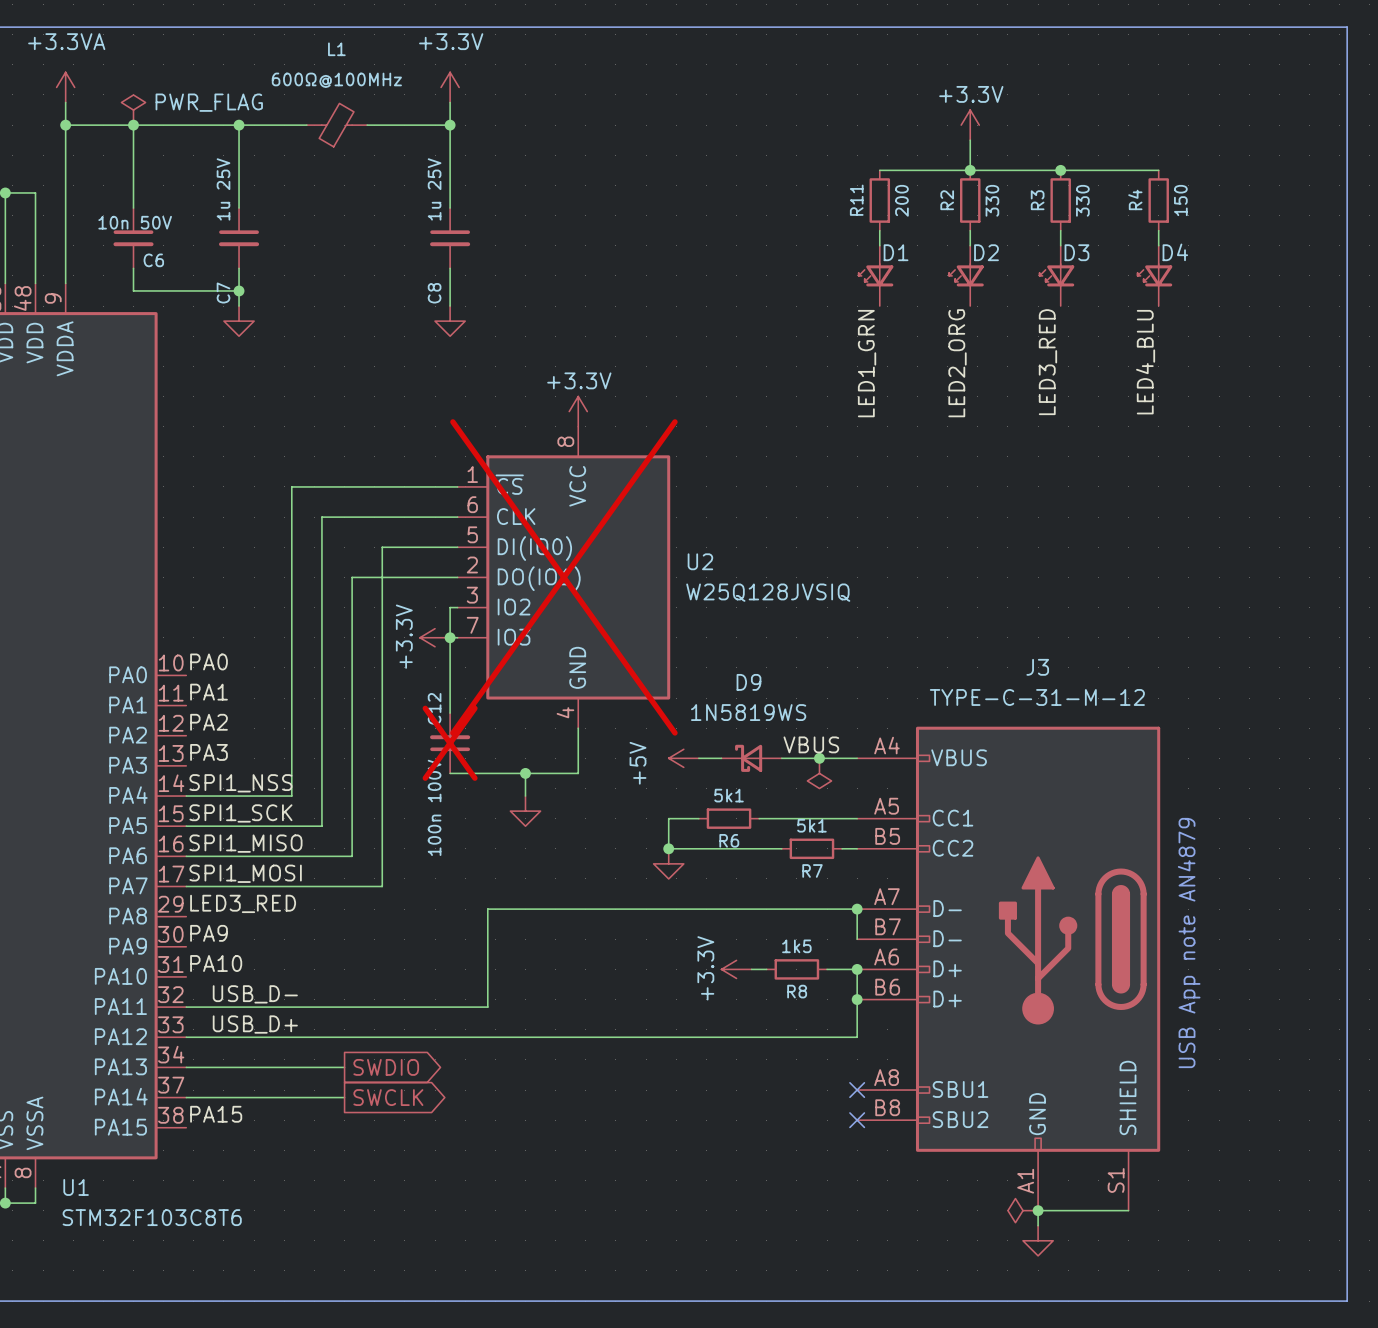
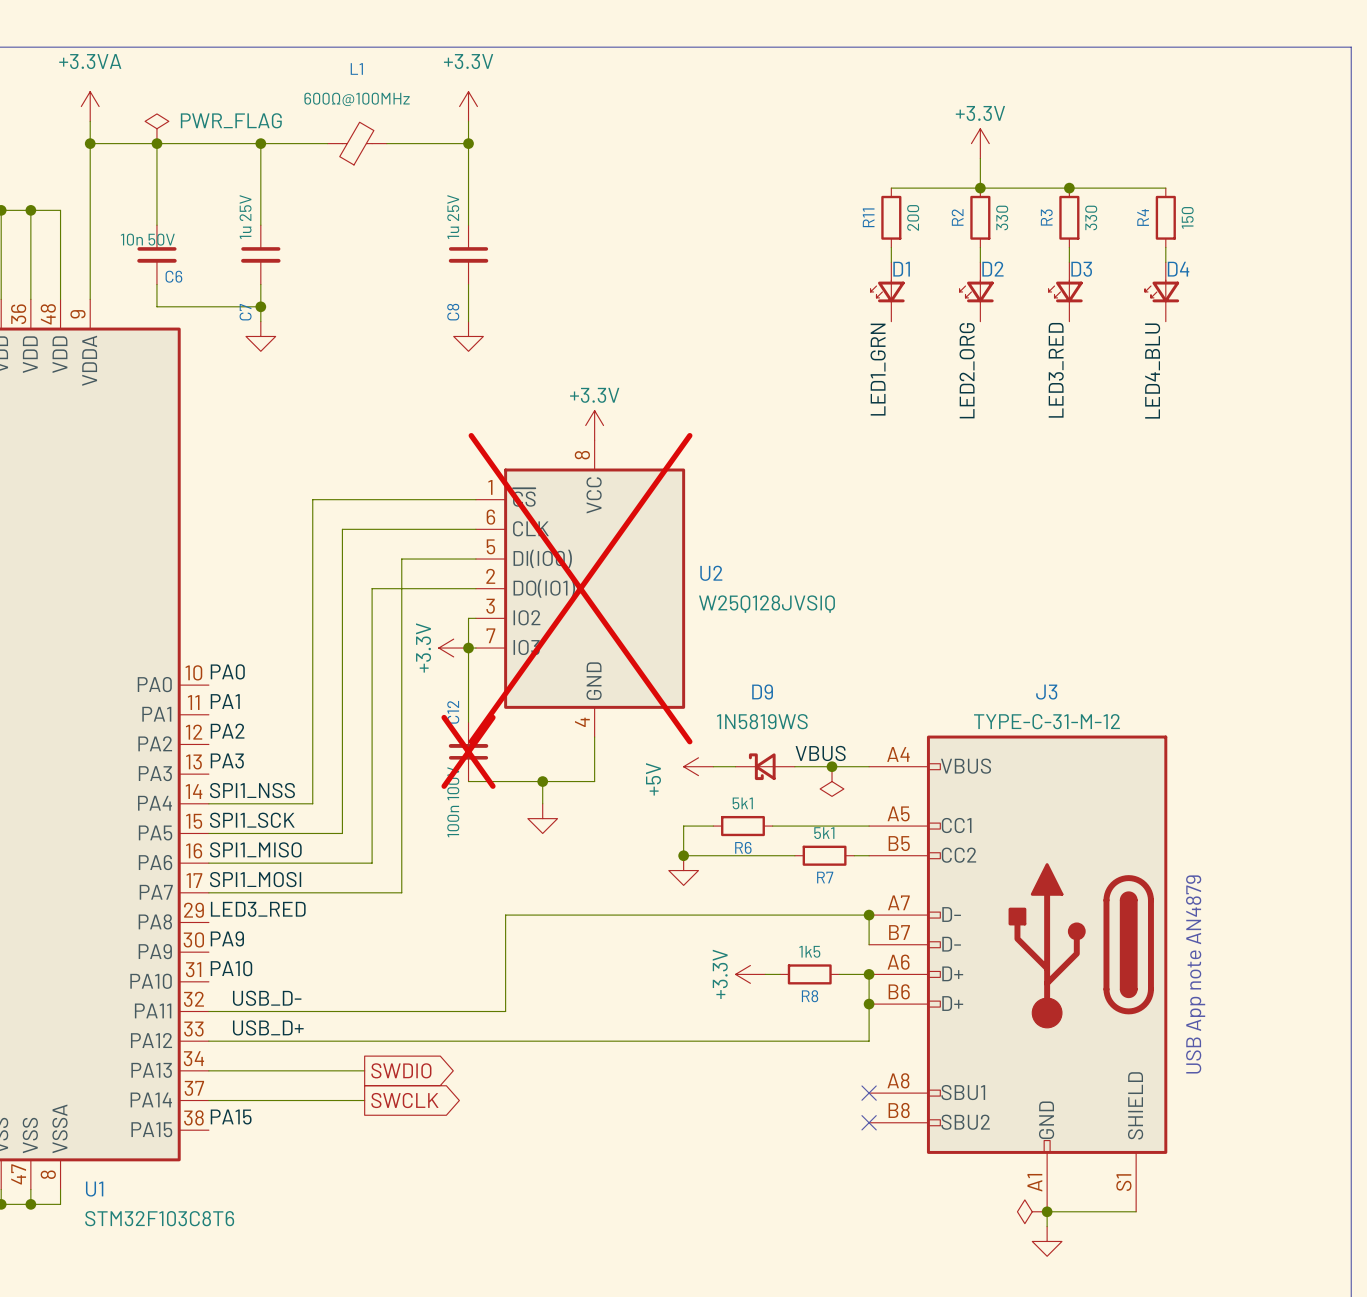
J3 name position: J3 (1037, 667) -> J3 (1046, 692)
J3 value position: TYPE-C-31-M-12 (1037, 697) -> TYPE-C-31-M-12 (1046, 721)

